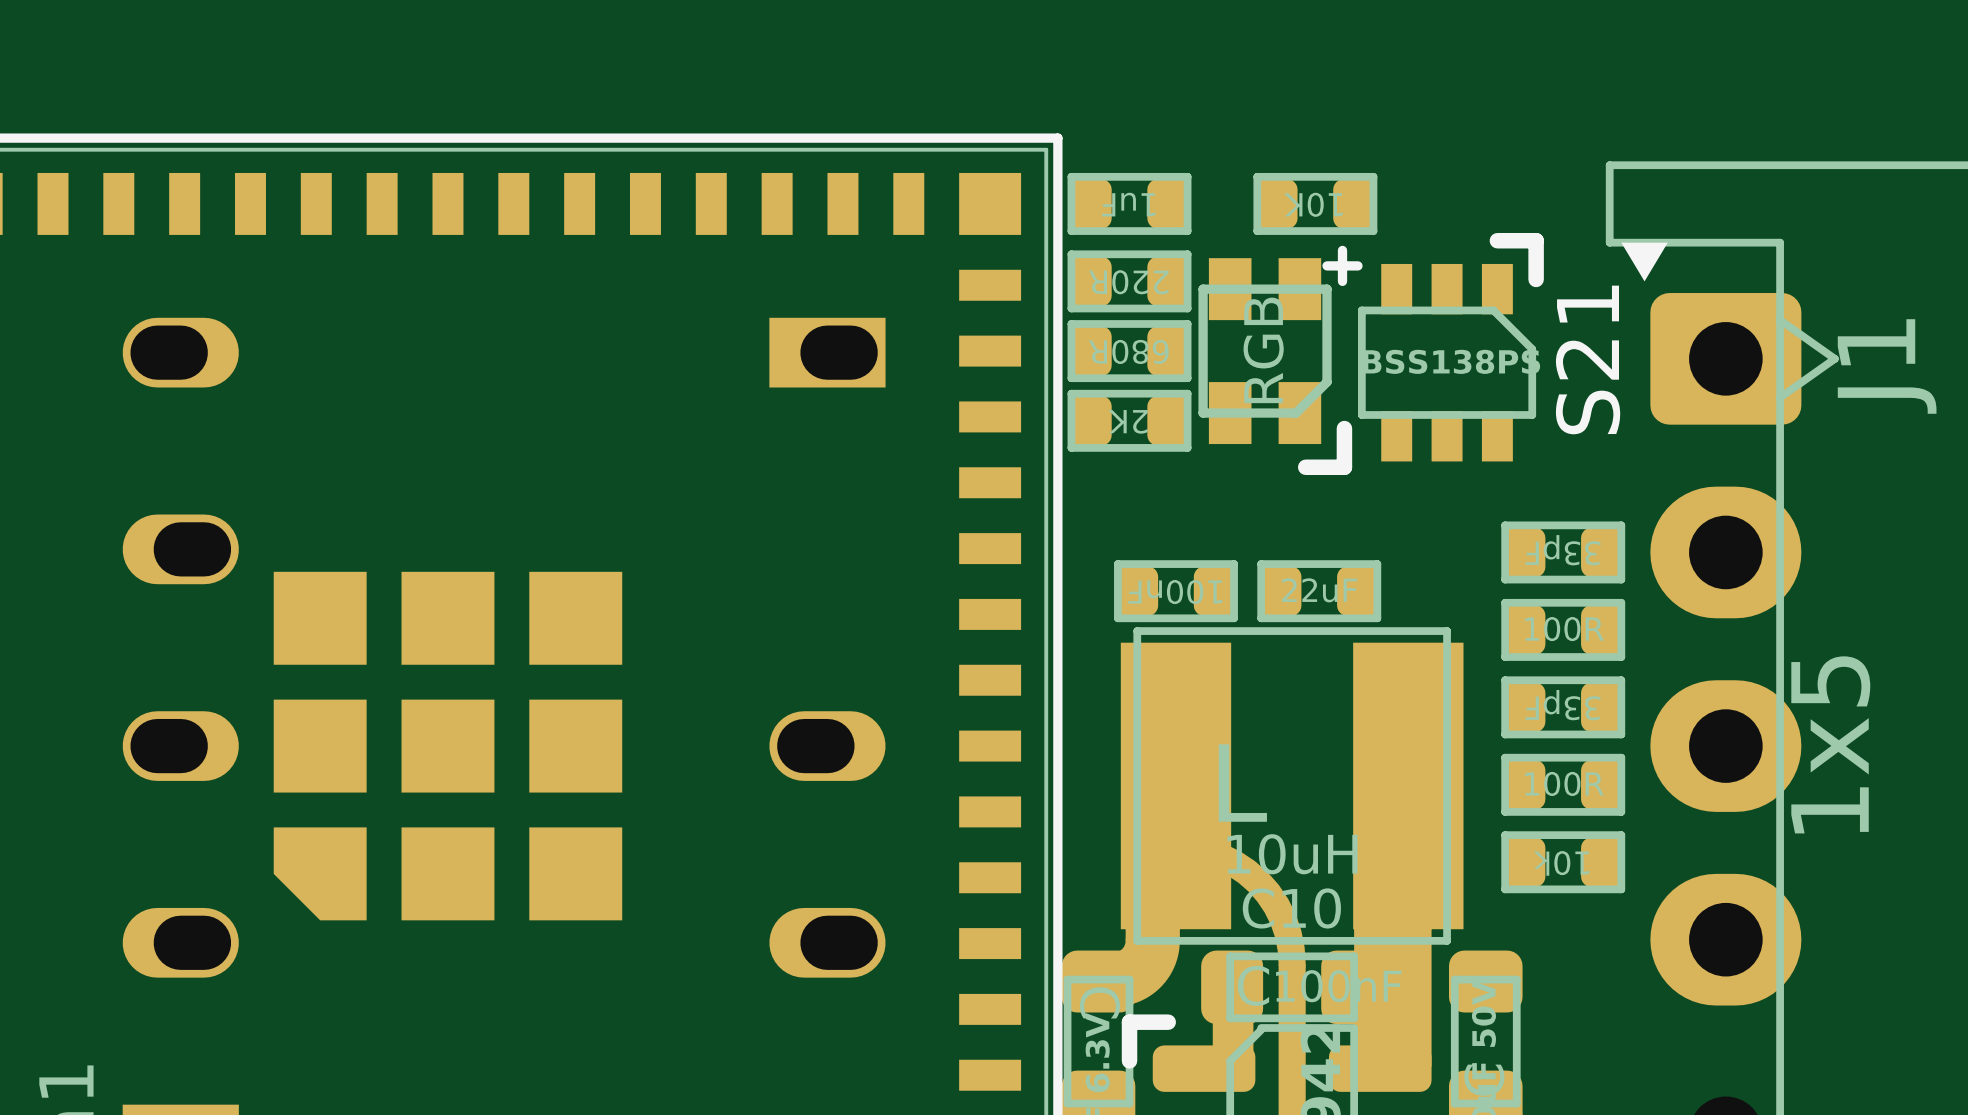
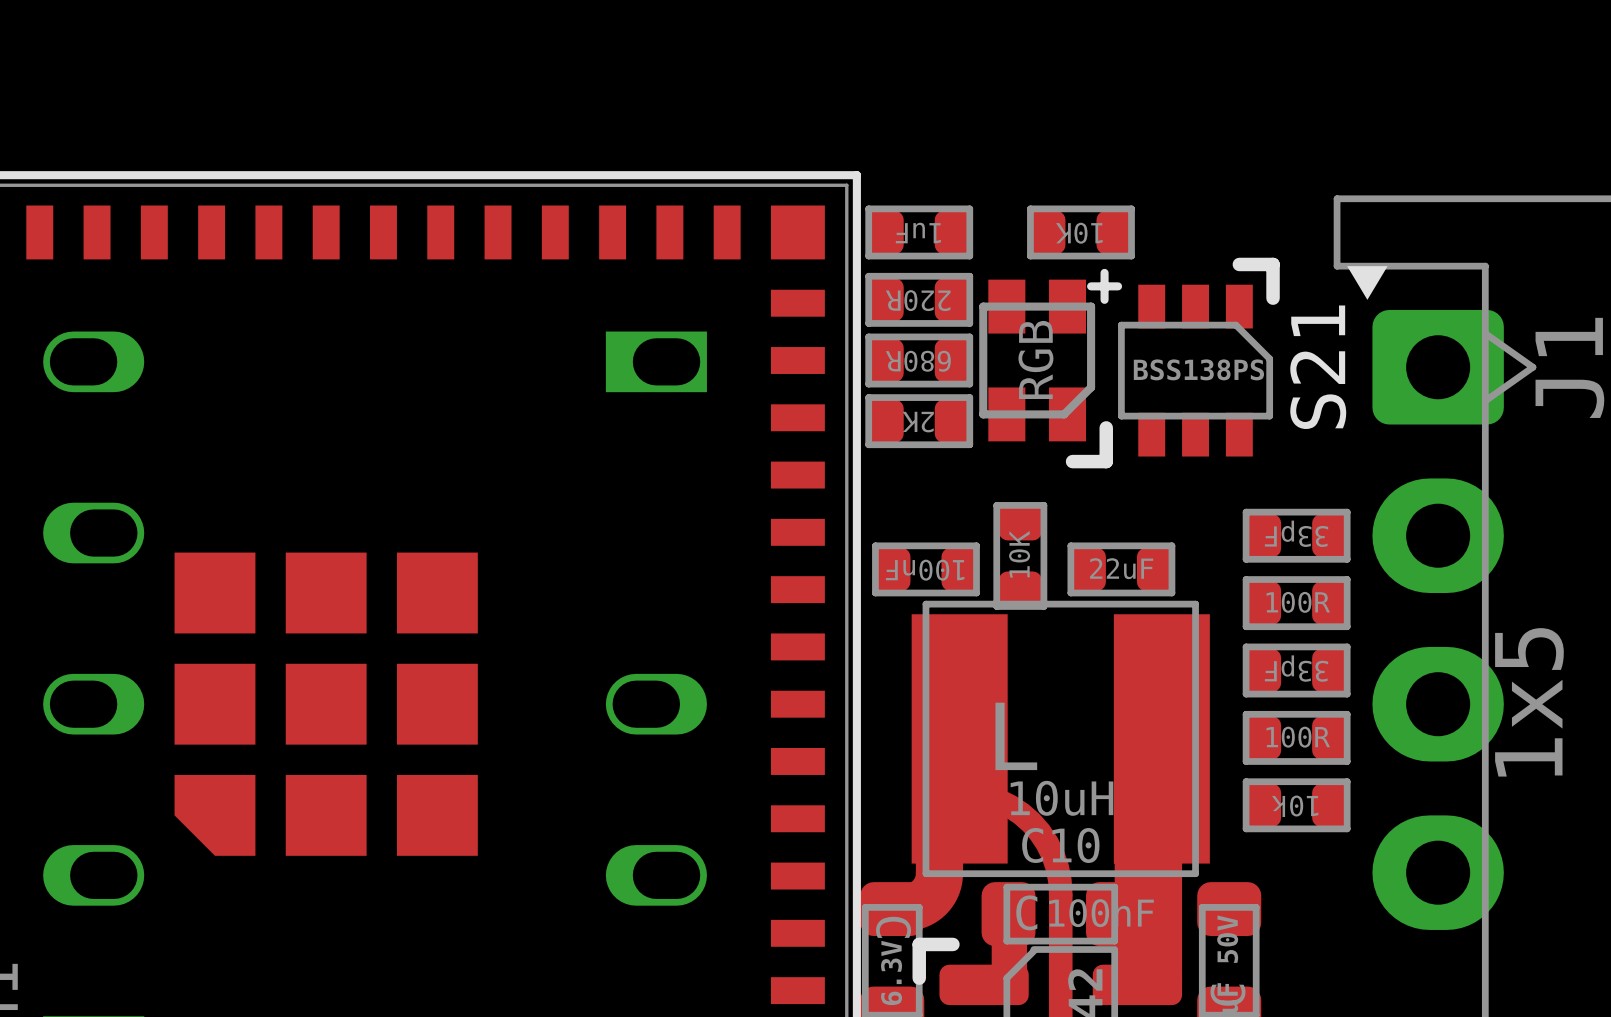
part: none -> 10K (1020, 555)
part position: (1175, 591) -> (925, 569)
part position: (1319, 591) -> (1121, 569)

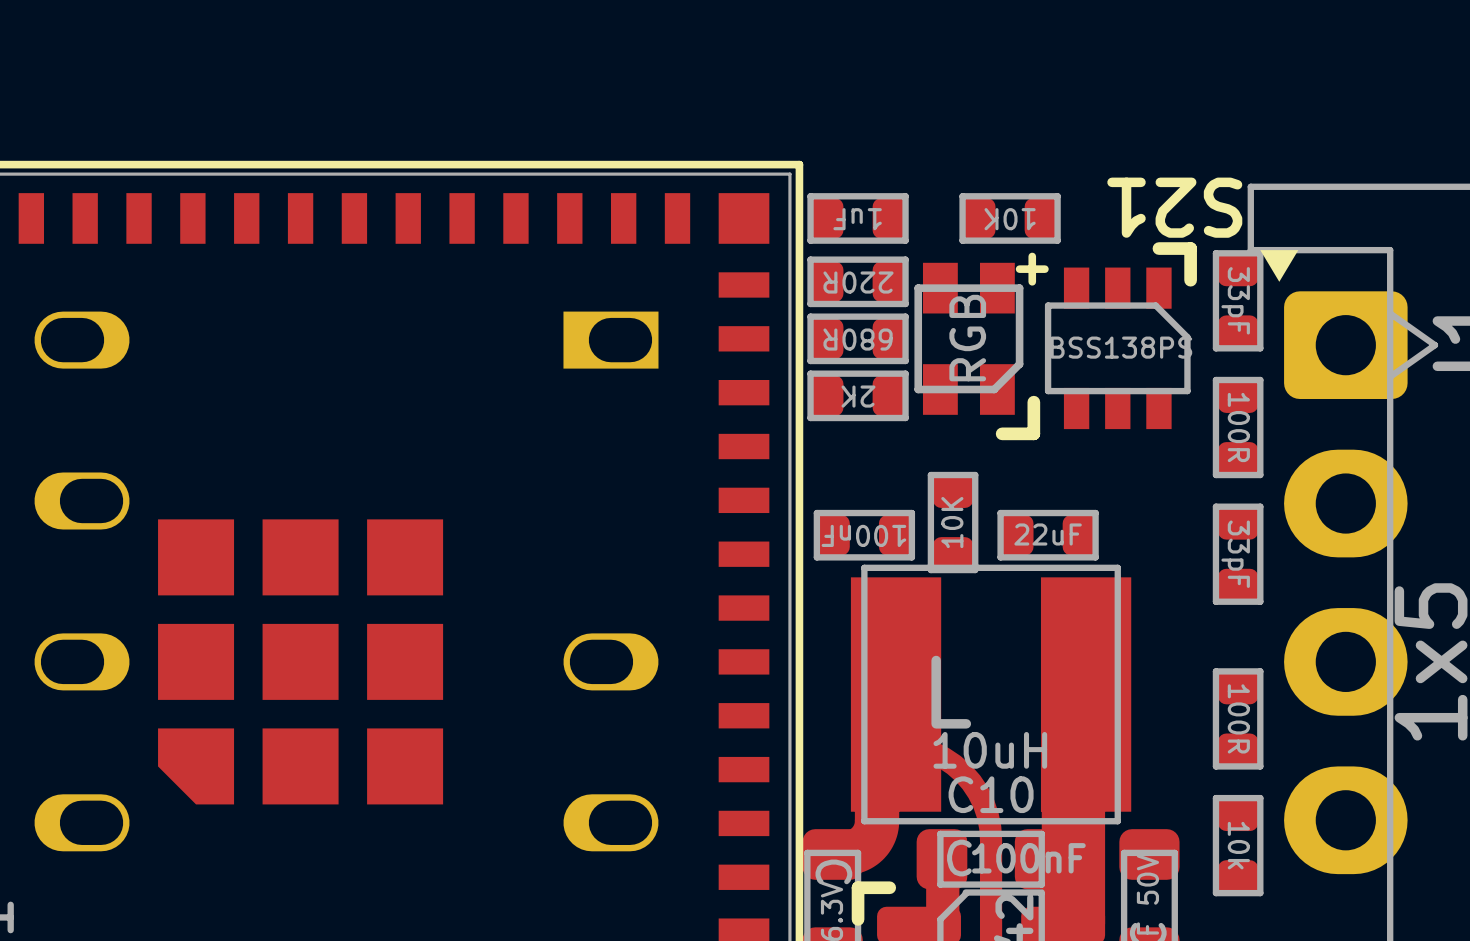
part: none -> 33pF (1238, 300)
text rotation: 0° (1318, 367) -> 90° counterclockwise (1174, 207)
part: none -> 100R (1238, 427)
part: 33pF (1296, 535) -> none
part: none -> 33pF (1238, 554)
part: 100R (1296, 603) -> none
part: 33pF (1296, 670) -> none
part rotation: 0° (1296, 737) -> 90° clockwise (1238, 718)
part rotation: 0° (1296, 805) -> 90° clockwise (1238, 845)
part position: (1296, 805) -> (1238, 845)

